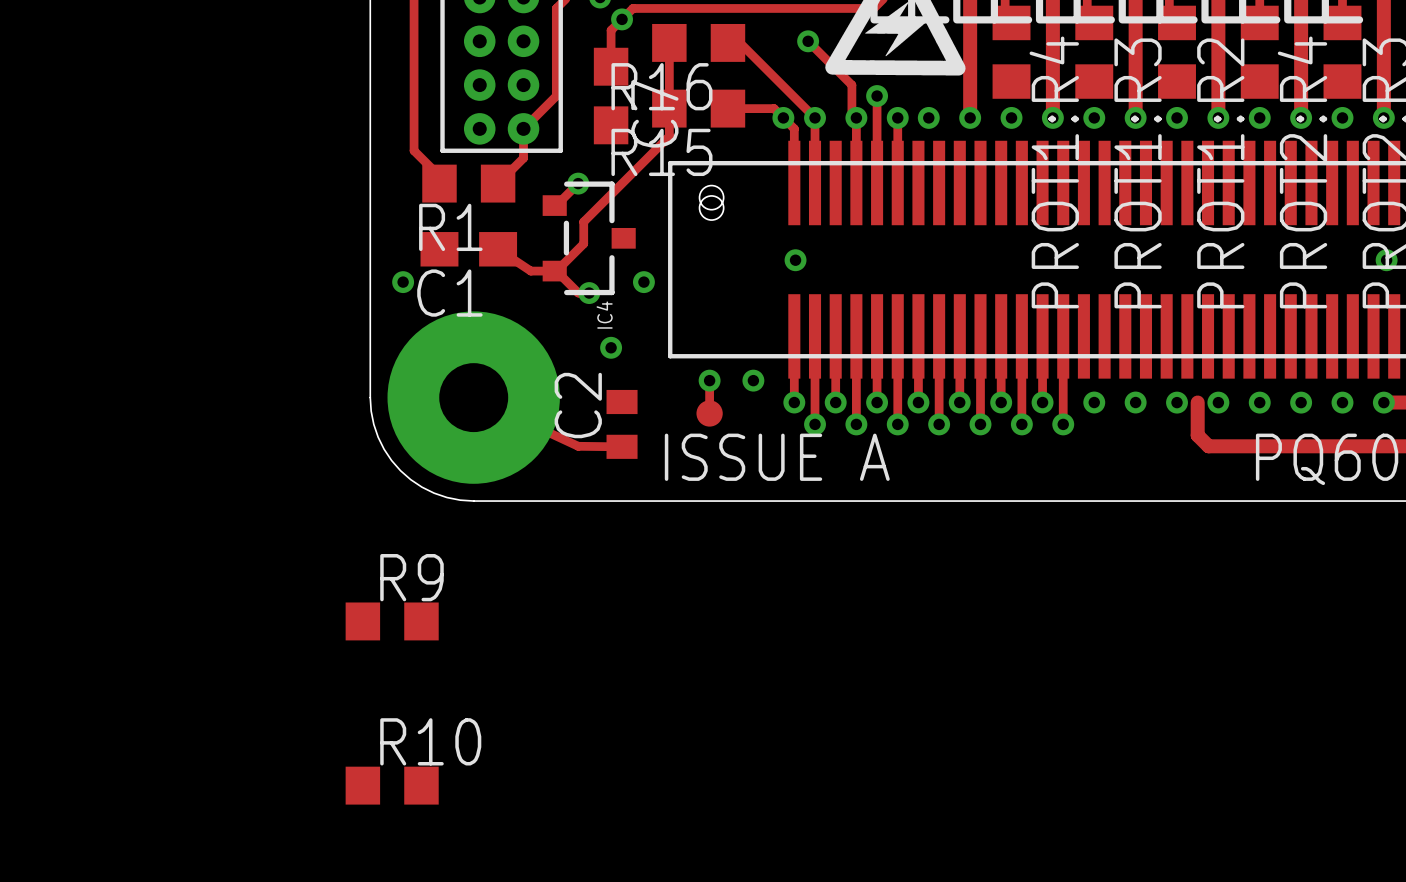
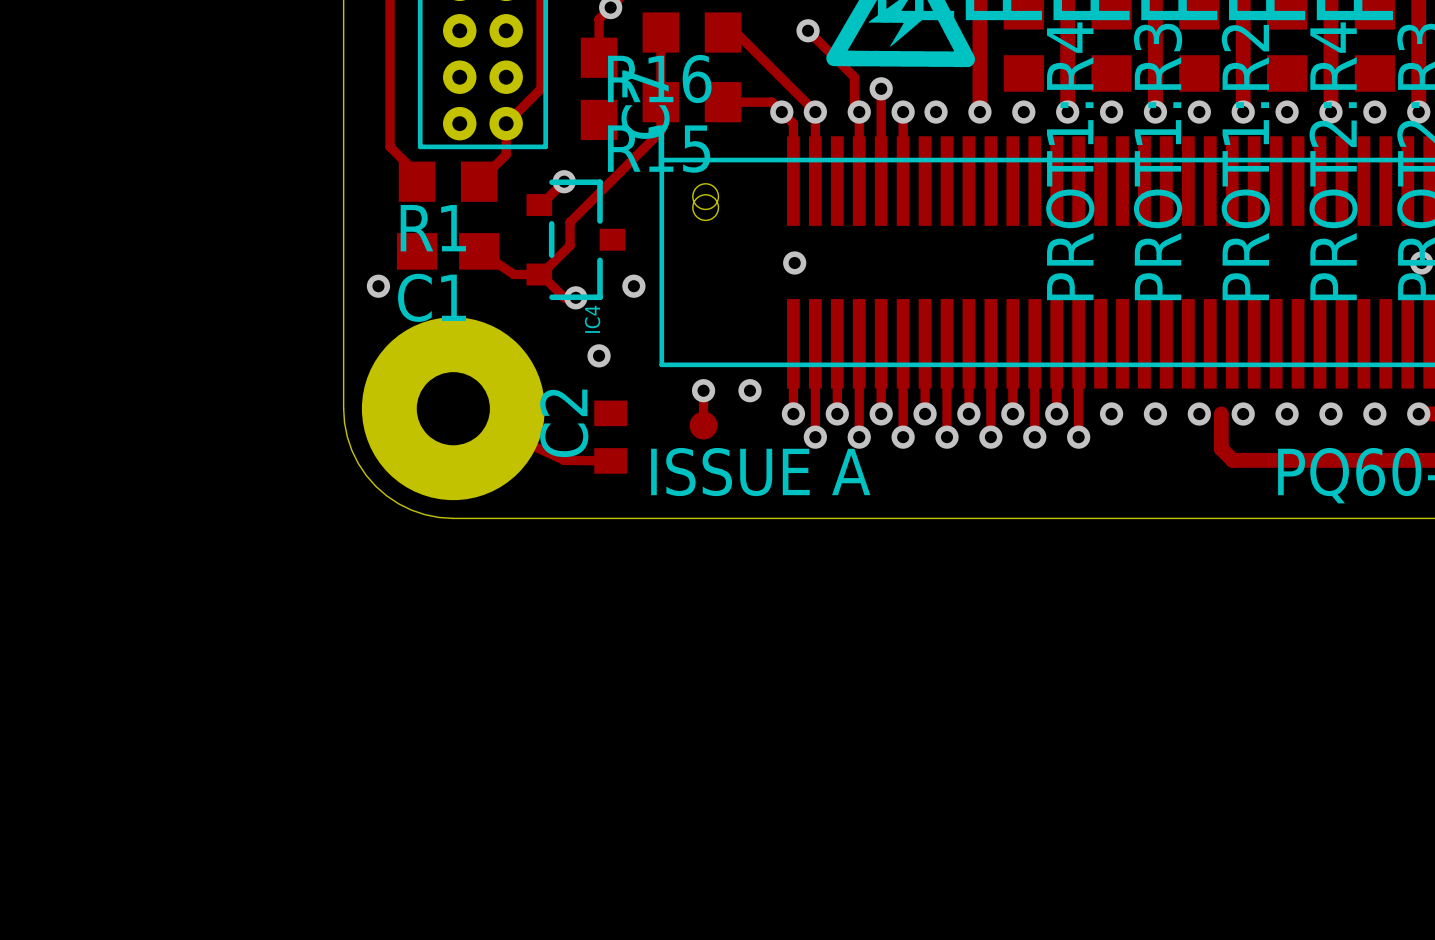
R9: (392, 621) -> none
R10: (392, 785) -> none

